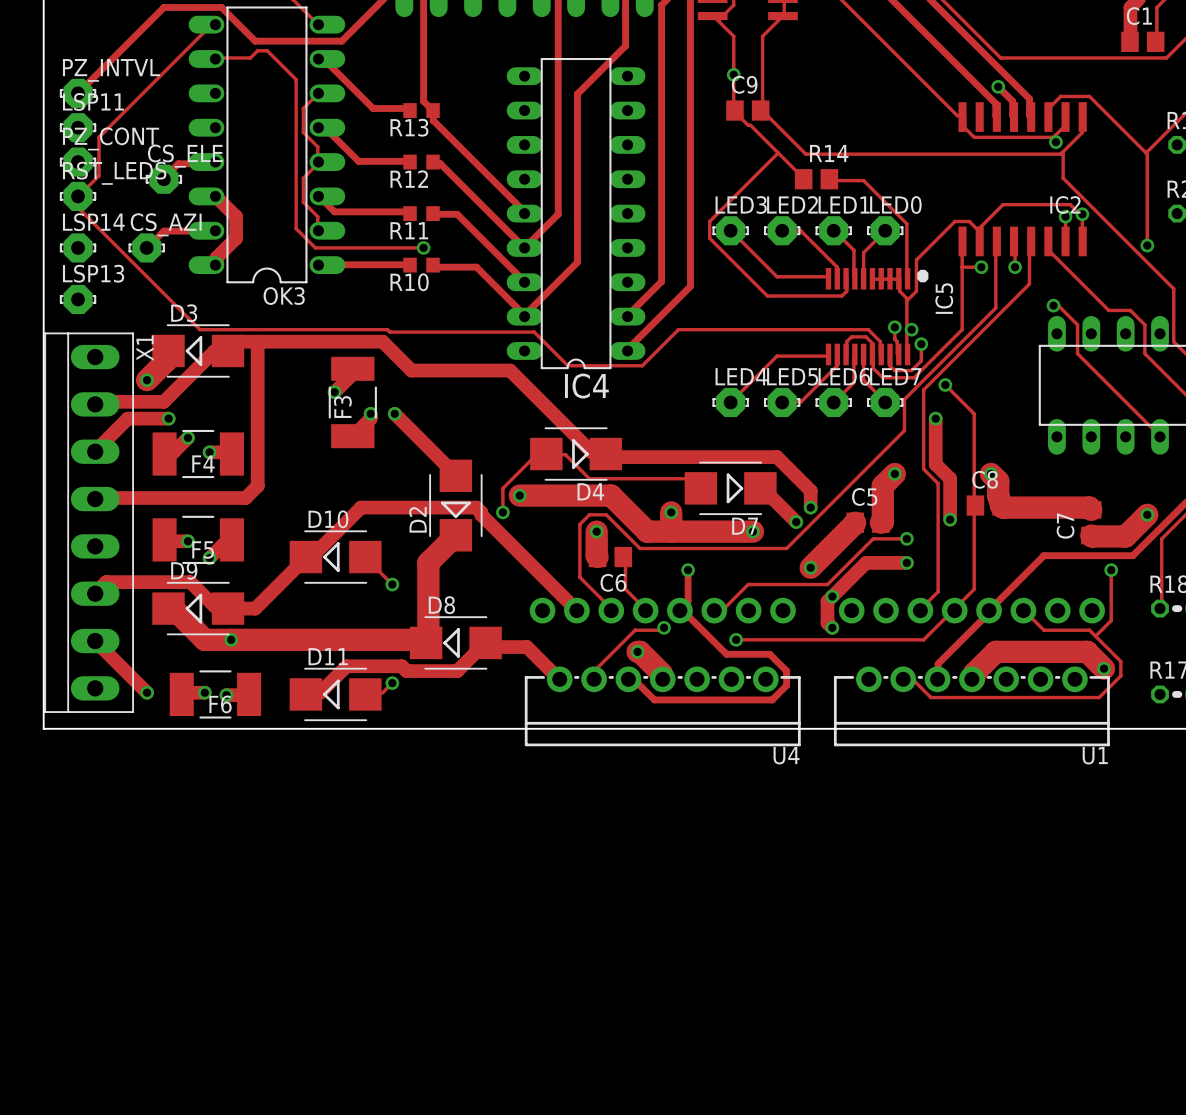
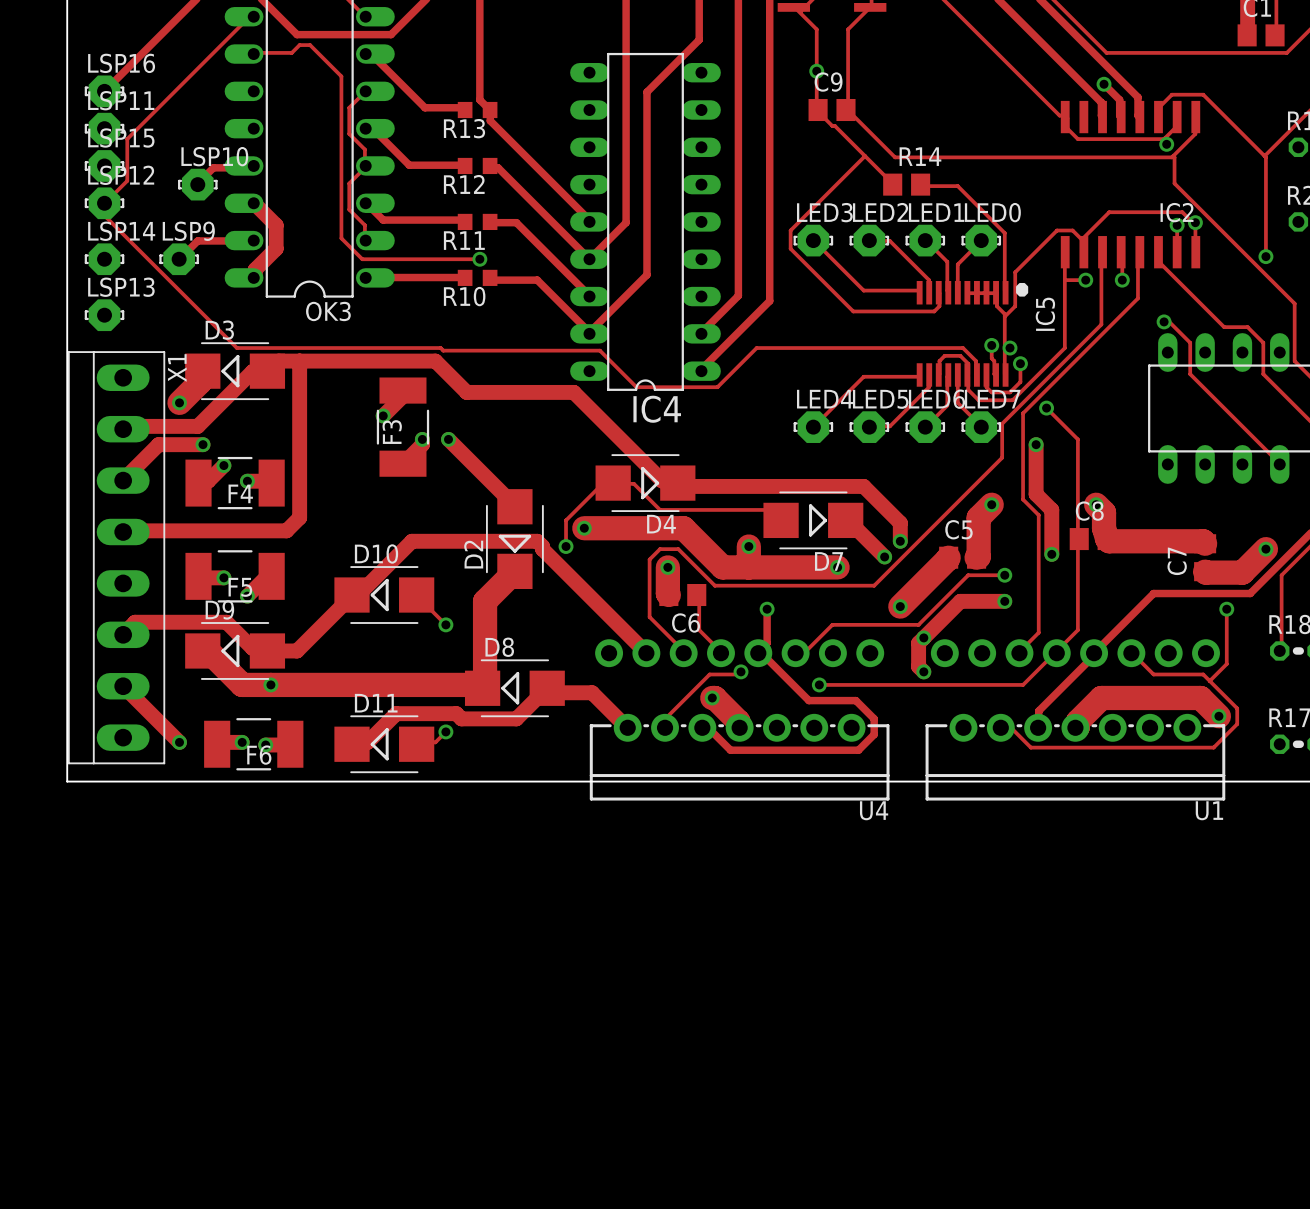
PZ_INTVL name: PZ_INTVL (111, 70) -> LSP16 (121, 63)
PZ_CONT name: PZ_CONT (111, 138) -> LSP15 (121, 138)
CS_ELE name: CS_ELE (185, 156) -> LSP10 (214, 156)
RST_LEDS name: RST_LEDS (114, 173) -> LSP12 (121, 175)
CS_AZI name: CS_AZI (166, 224) -> LSP9 (188, 231)

